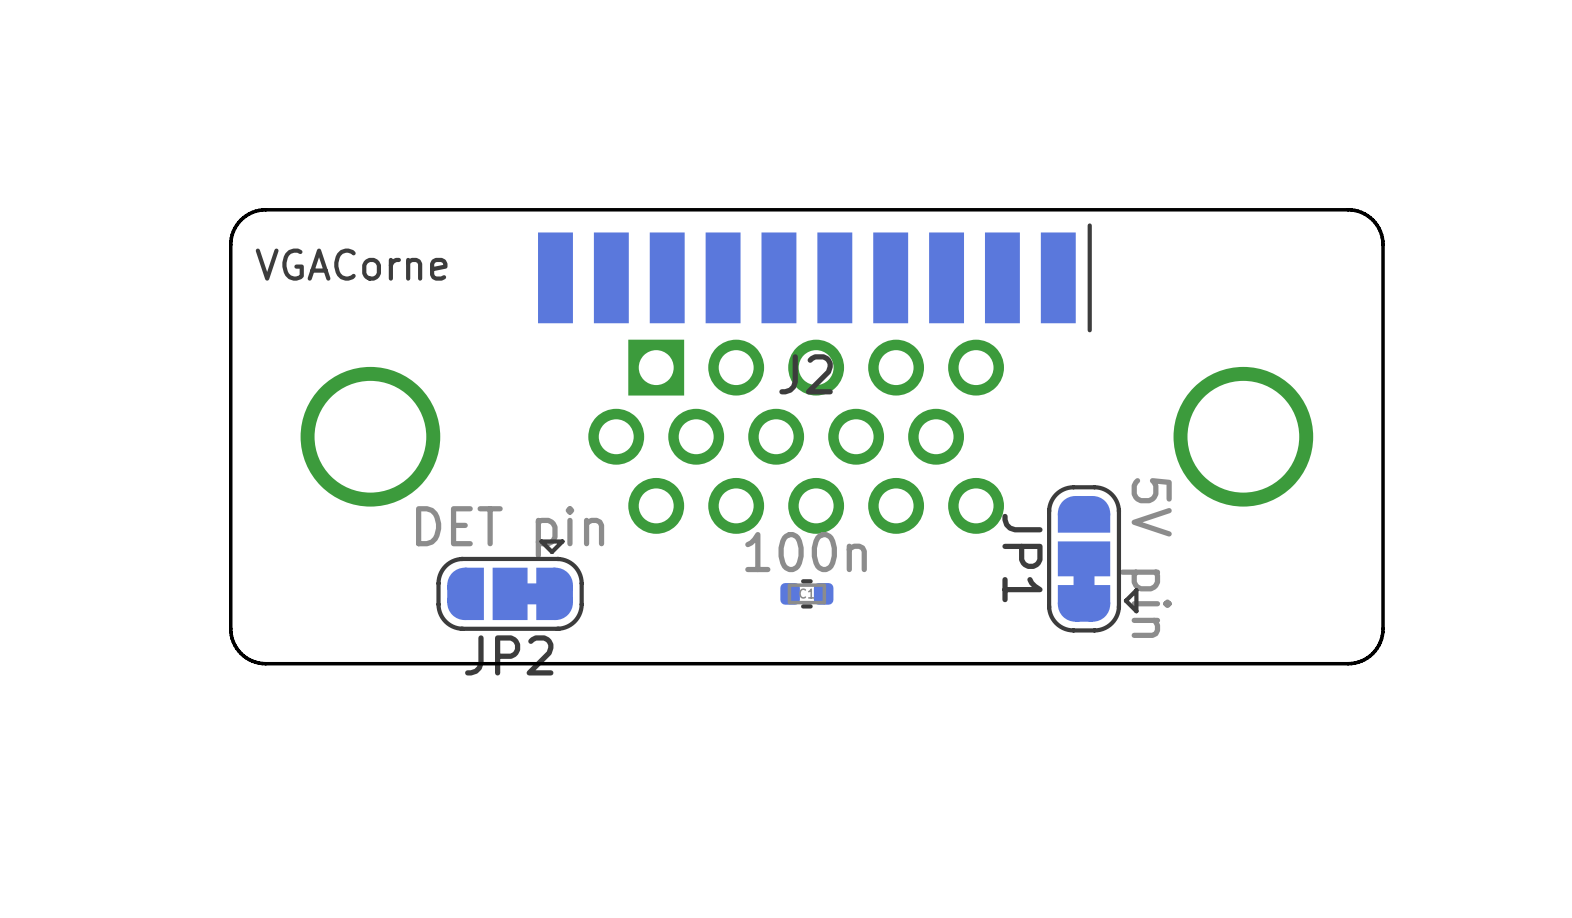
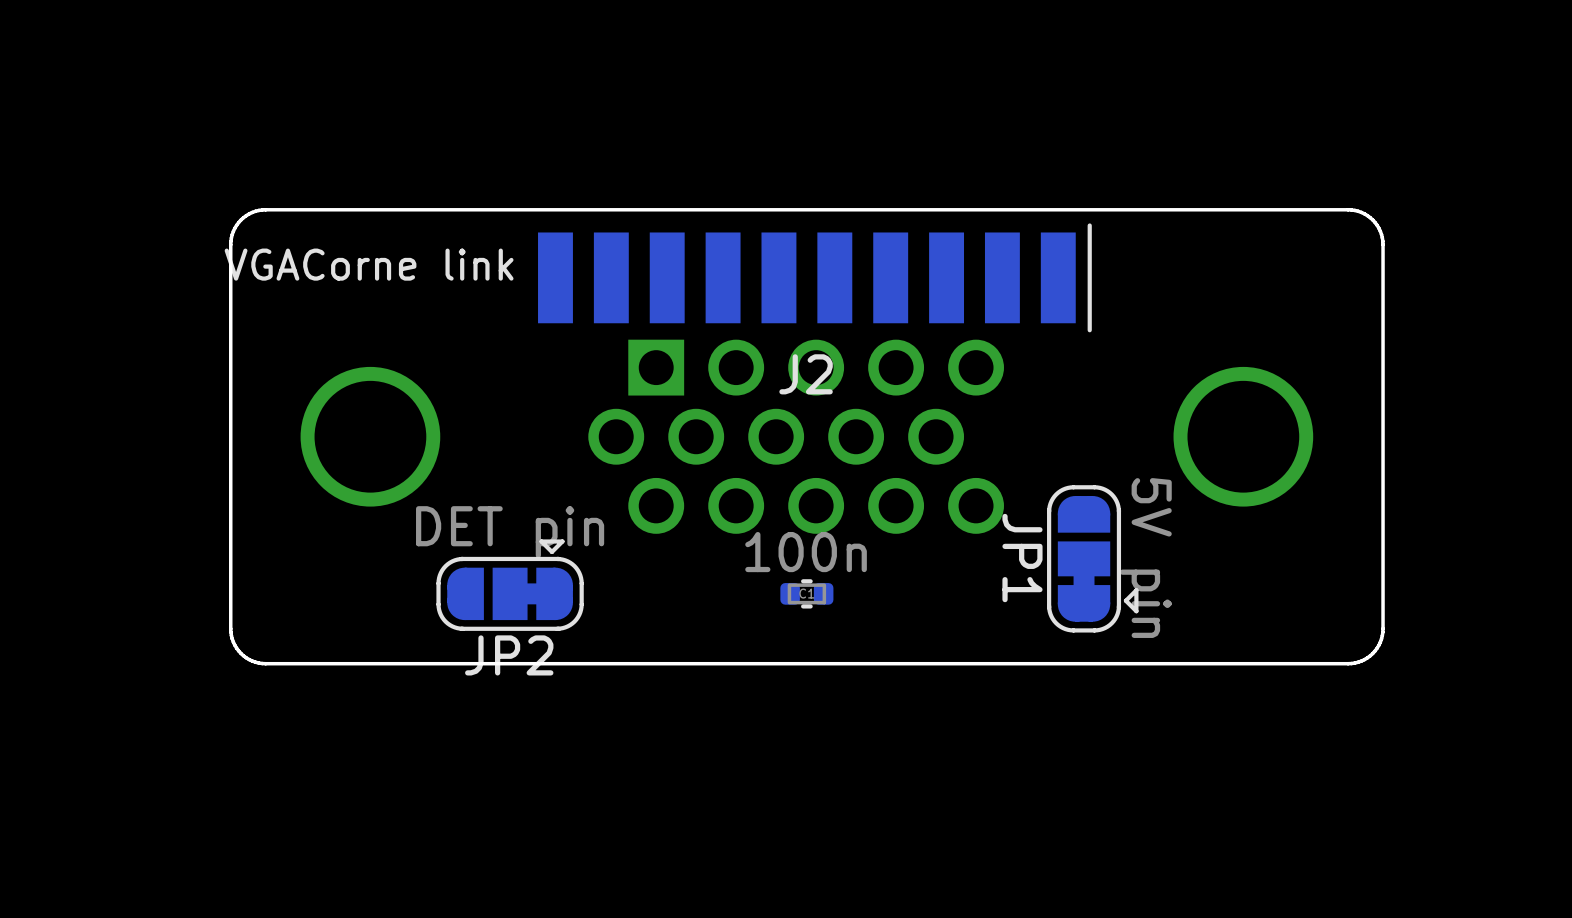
text: VGACorne (351, 264) -> VGACorne link (369, 264)

